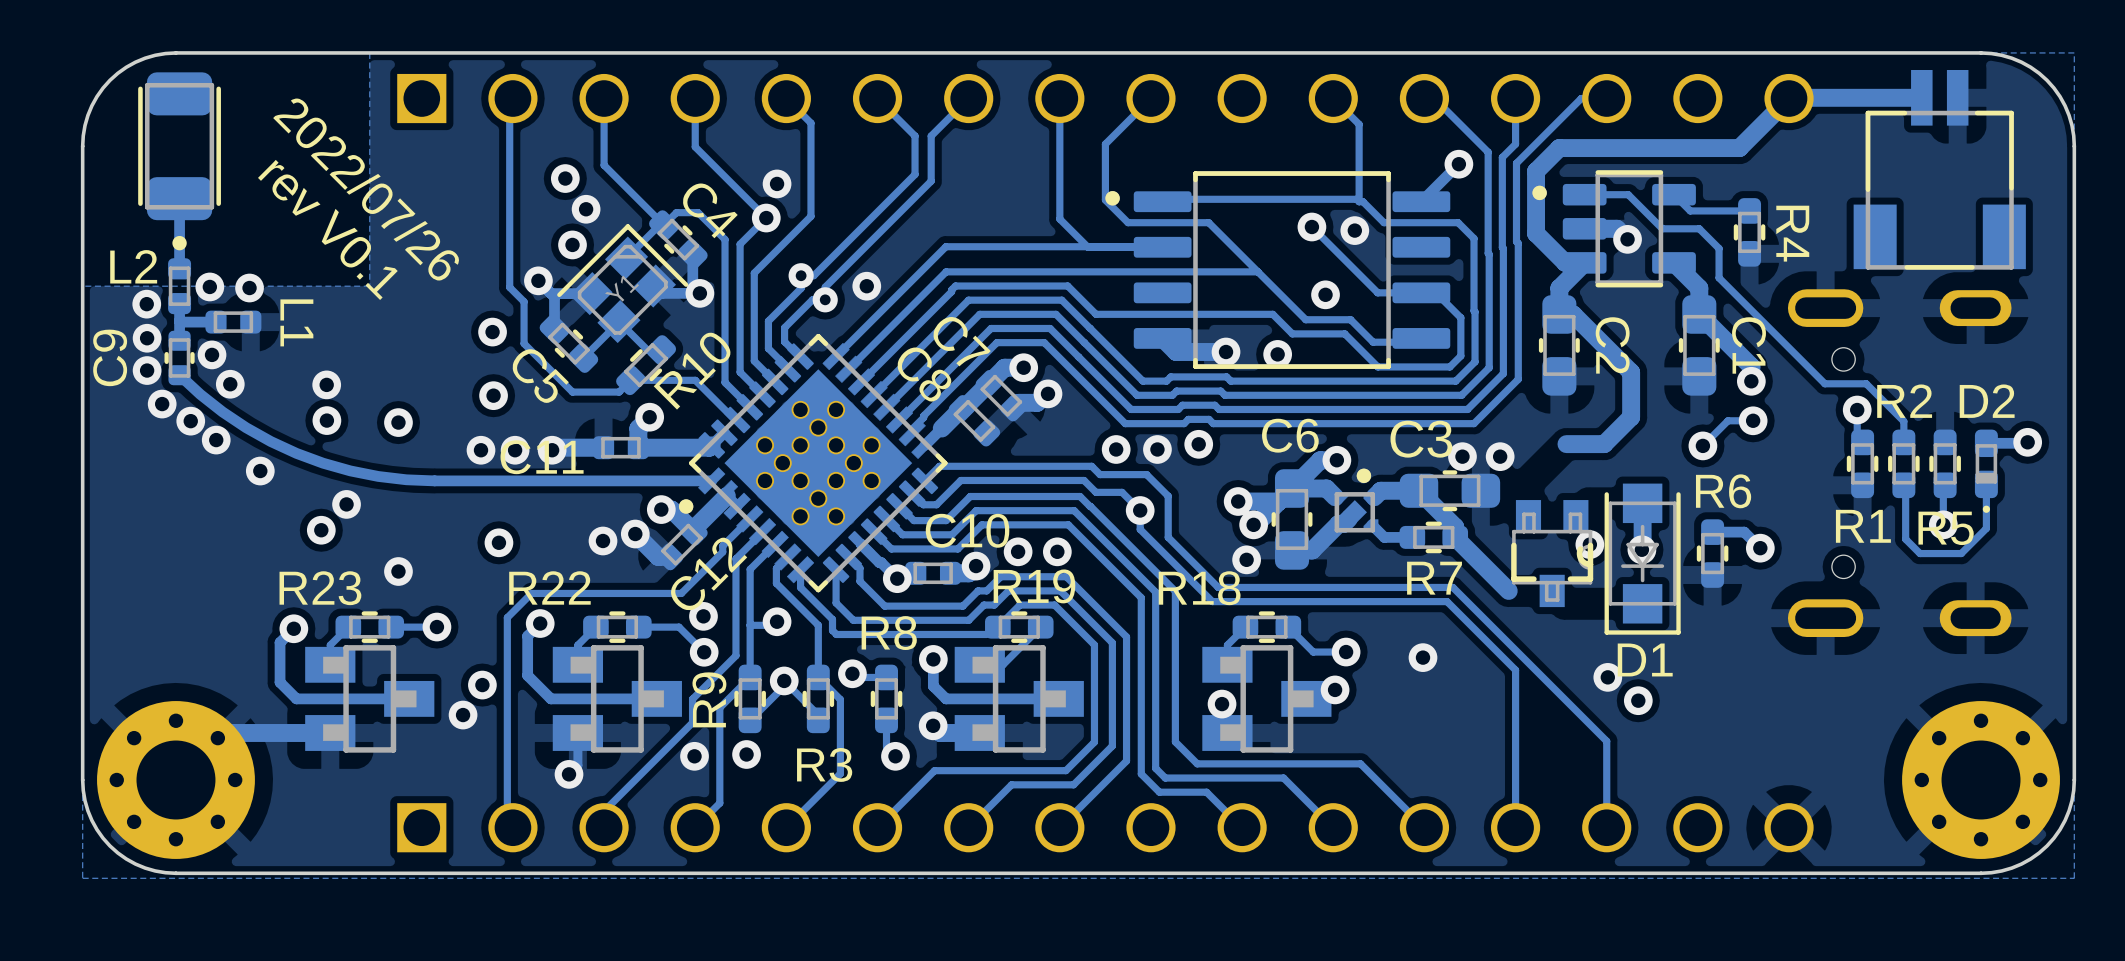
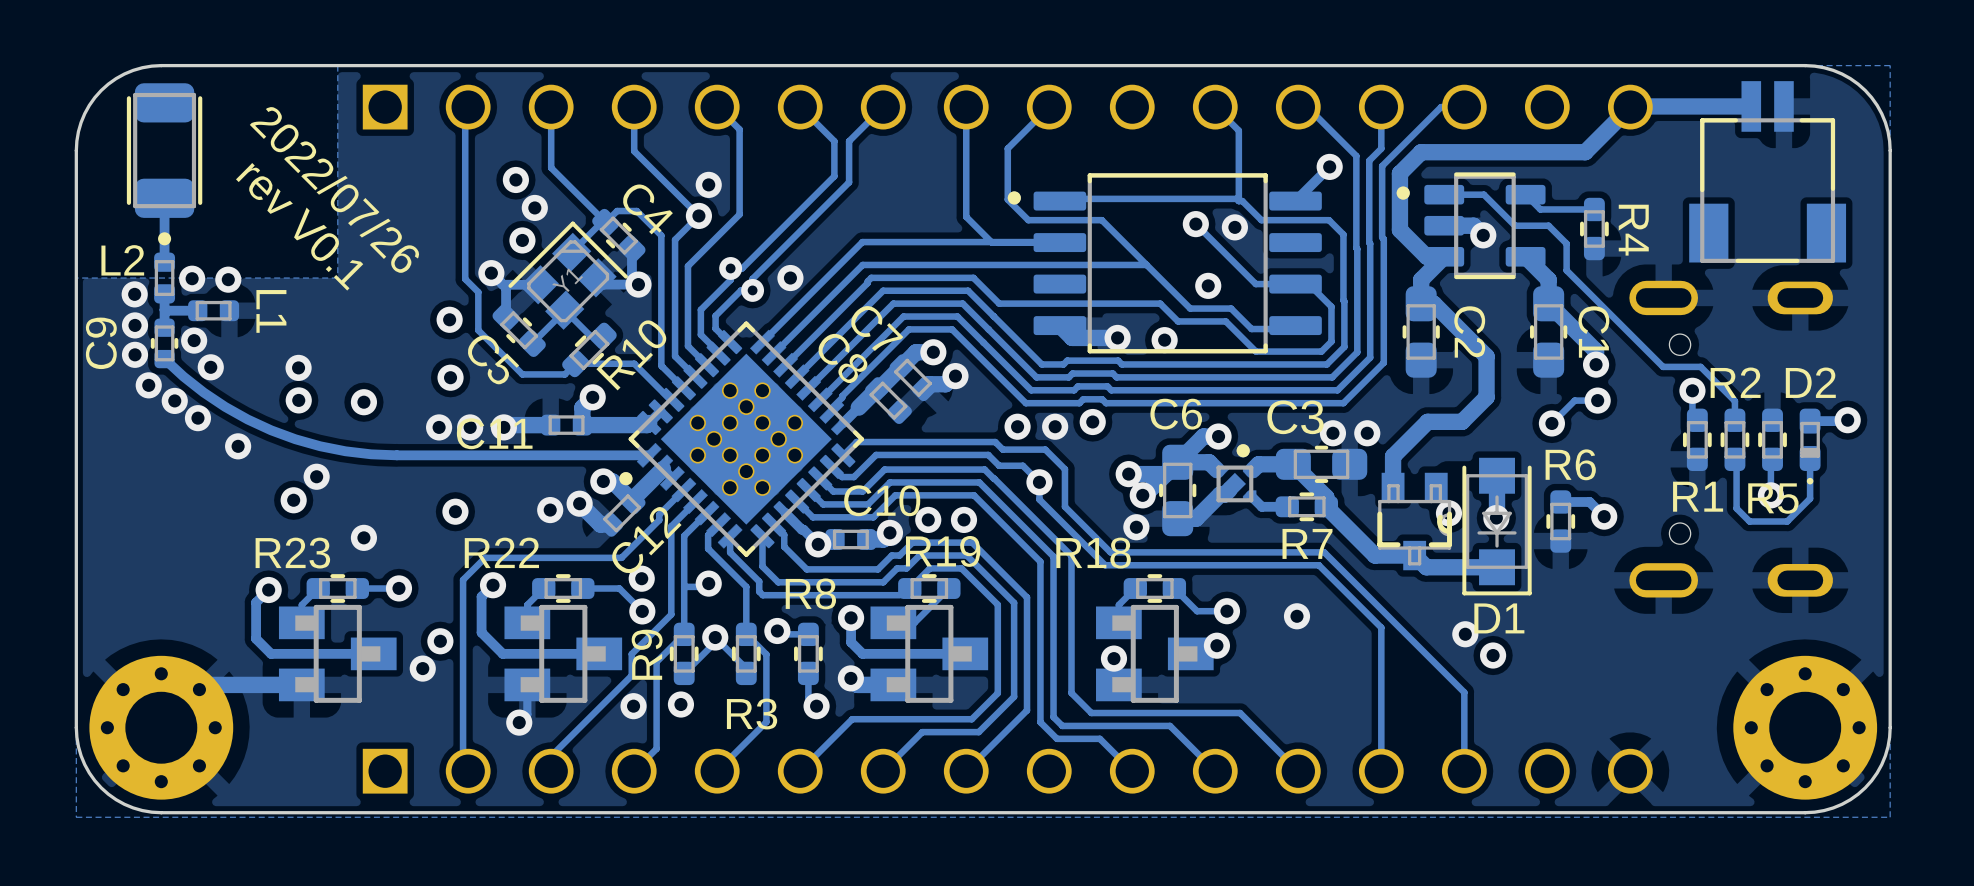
track: none -> (1427, 421) (1393, 456) (1393, 487)
track: none -> (1375, 555) (1414, 555) (1426, 567) (1497, 567)

